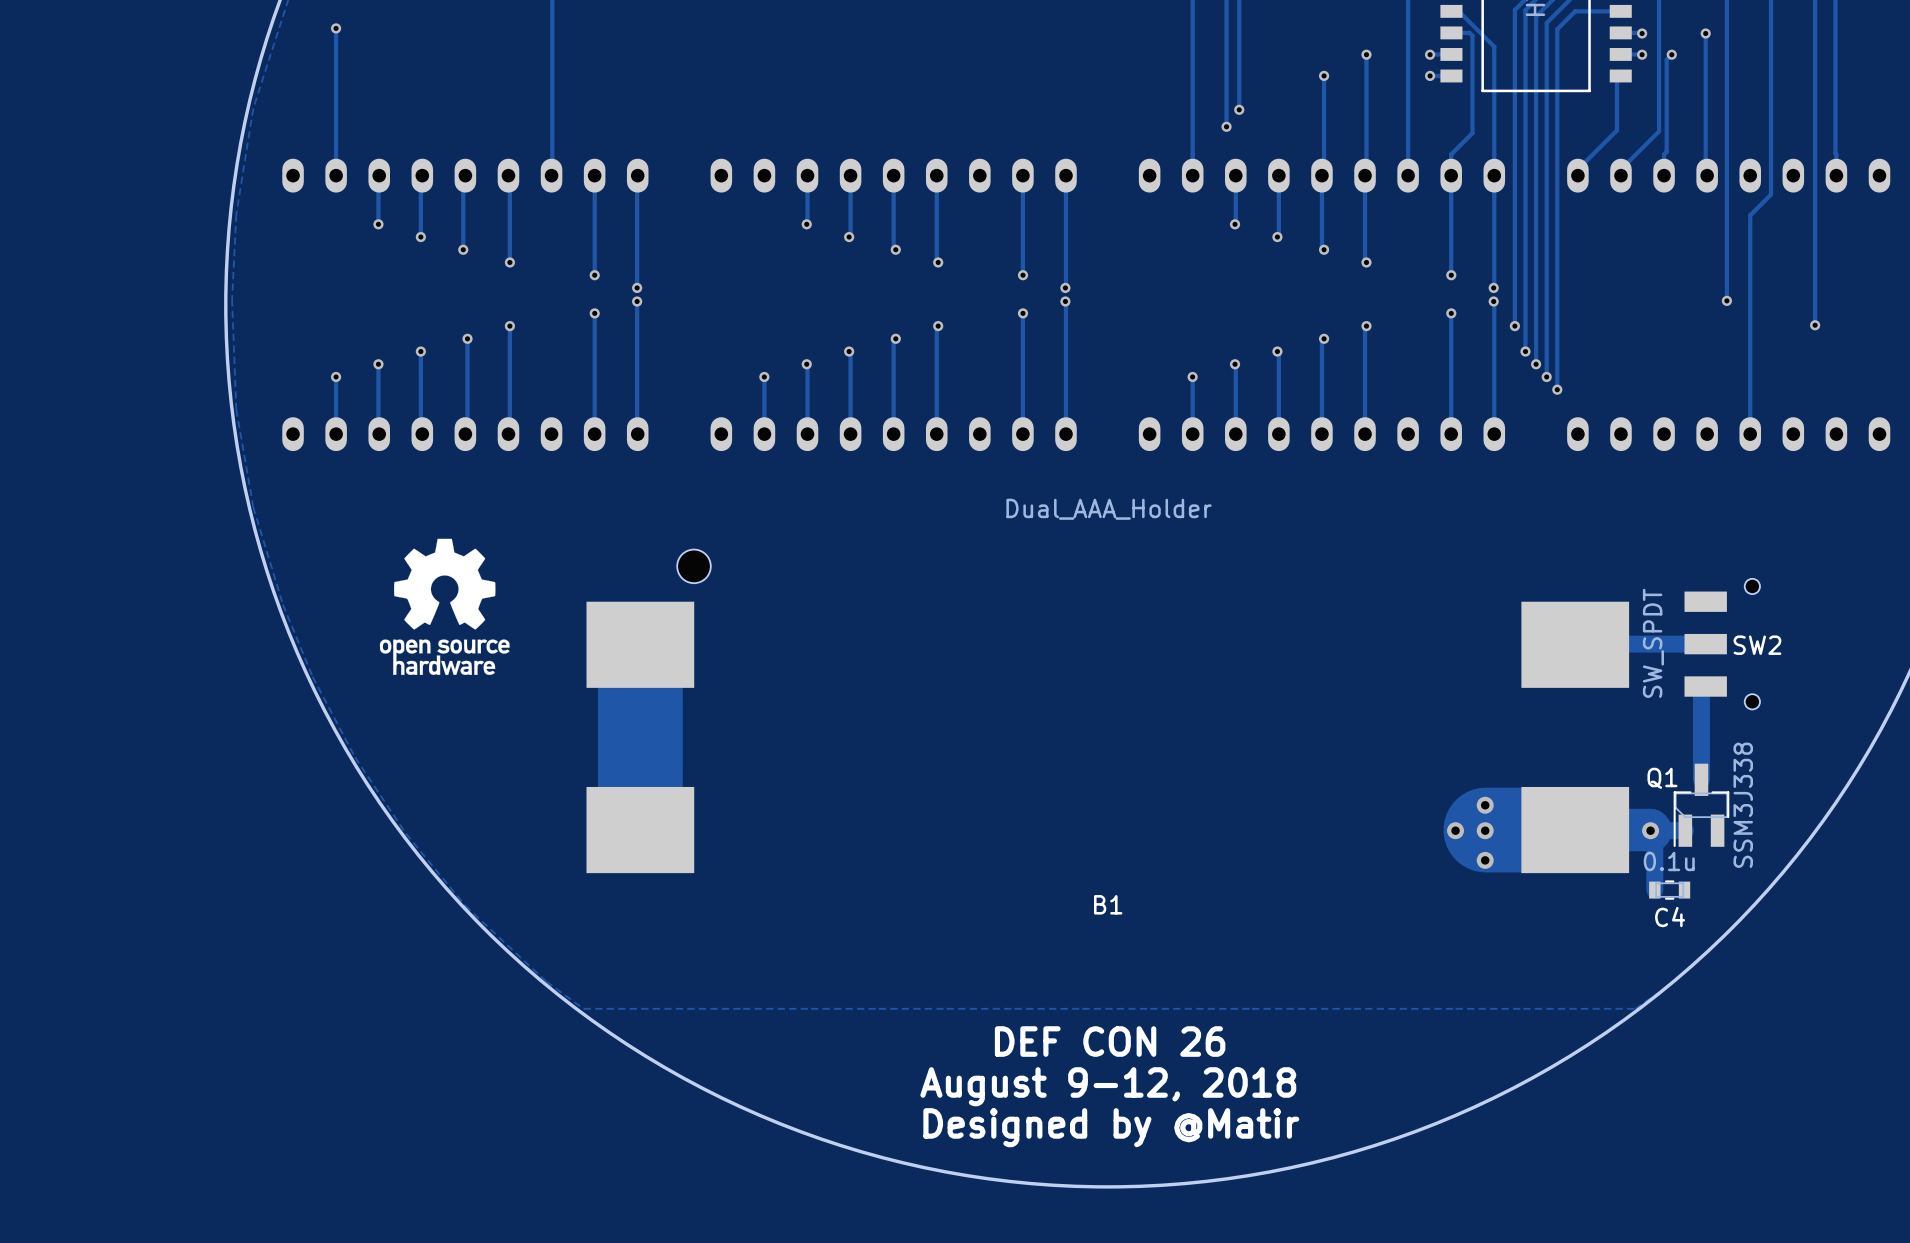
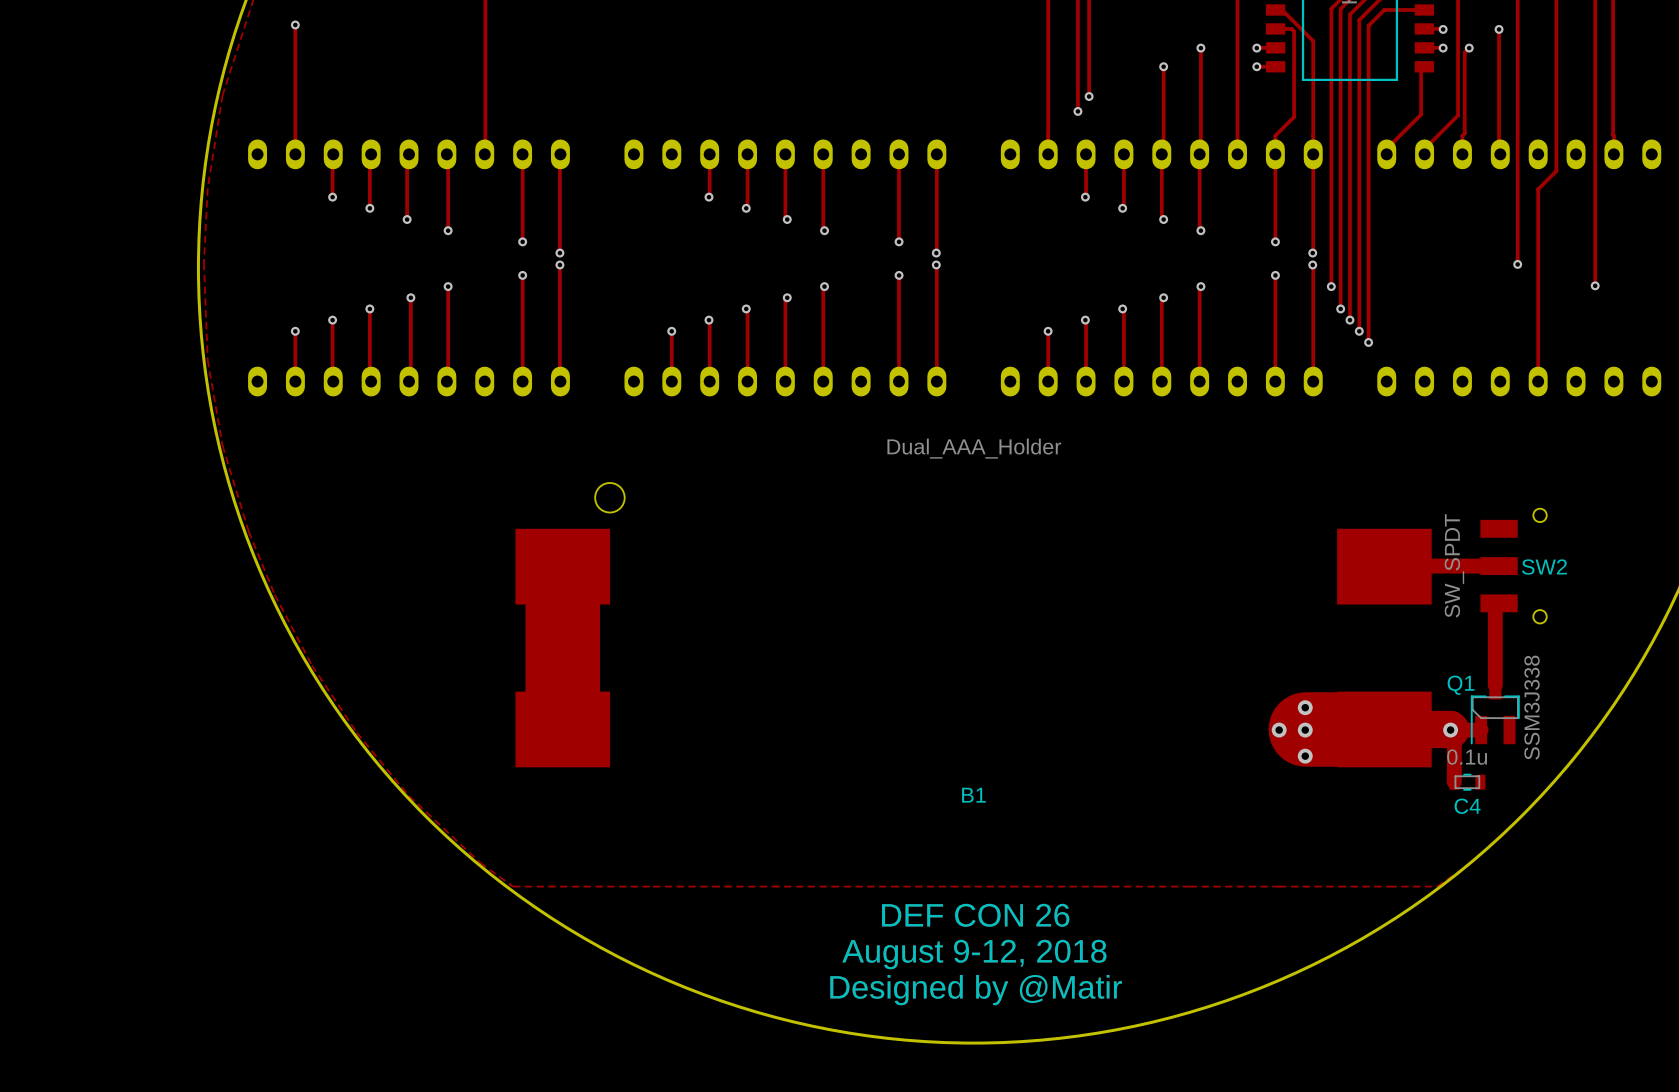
drawing: [379, 538, 510, 675] -> none

